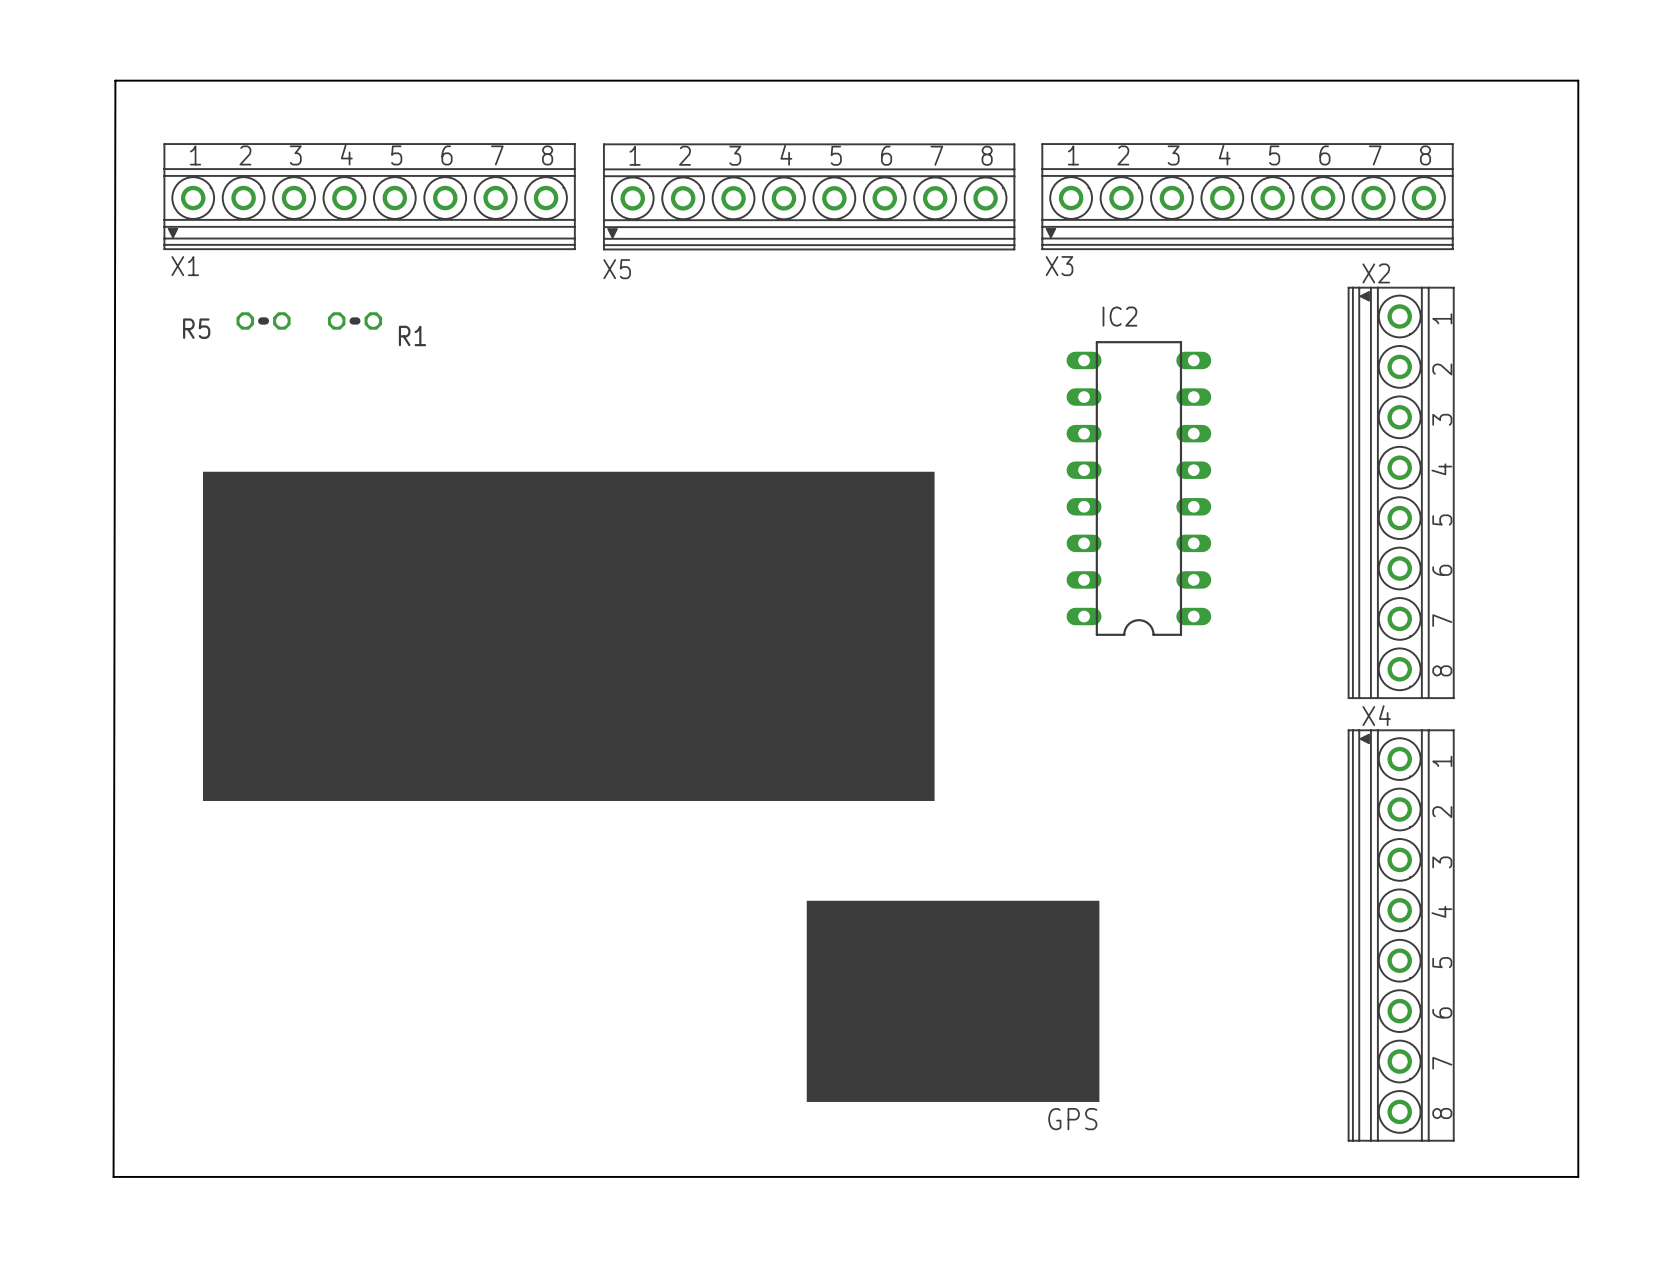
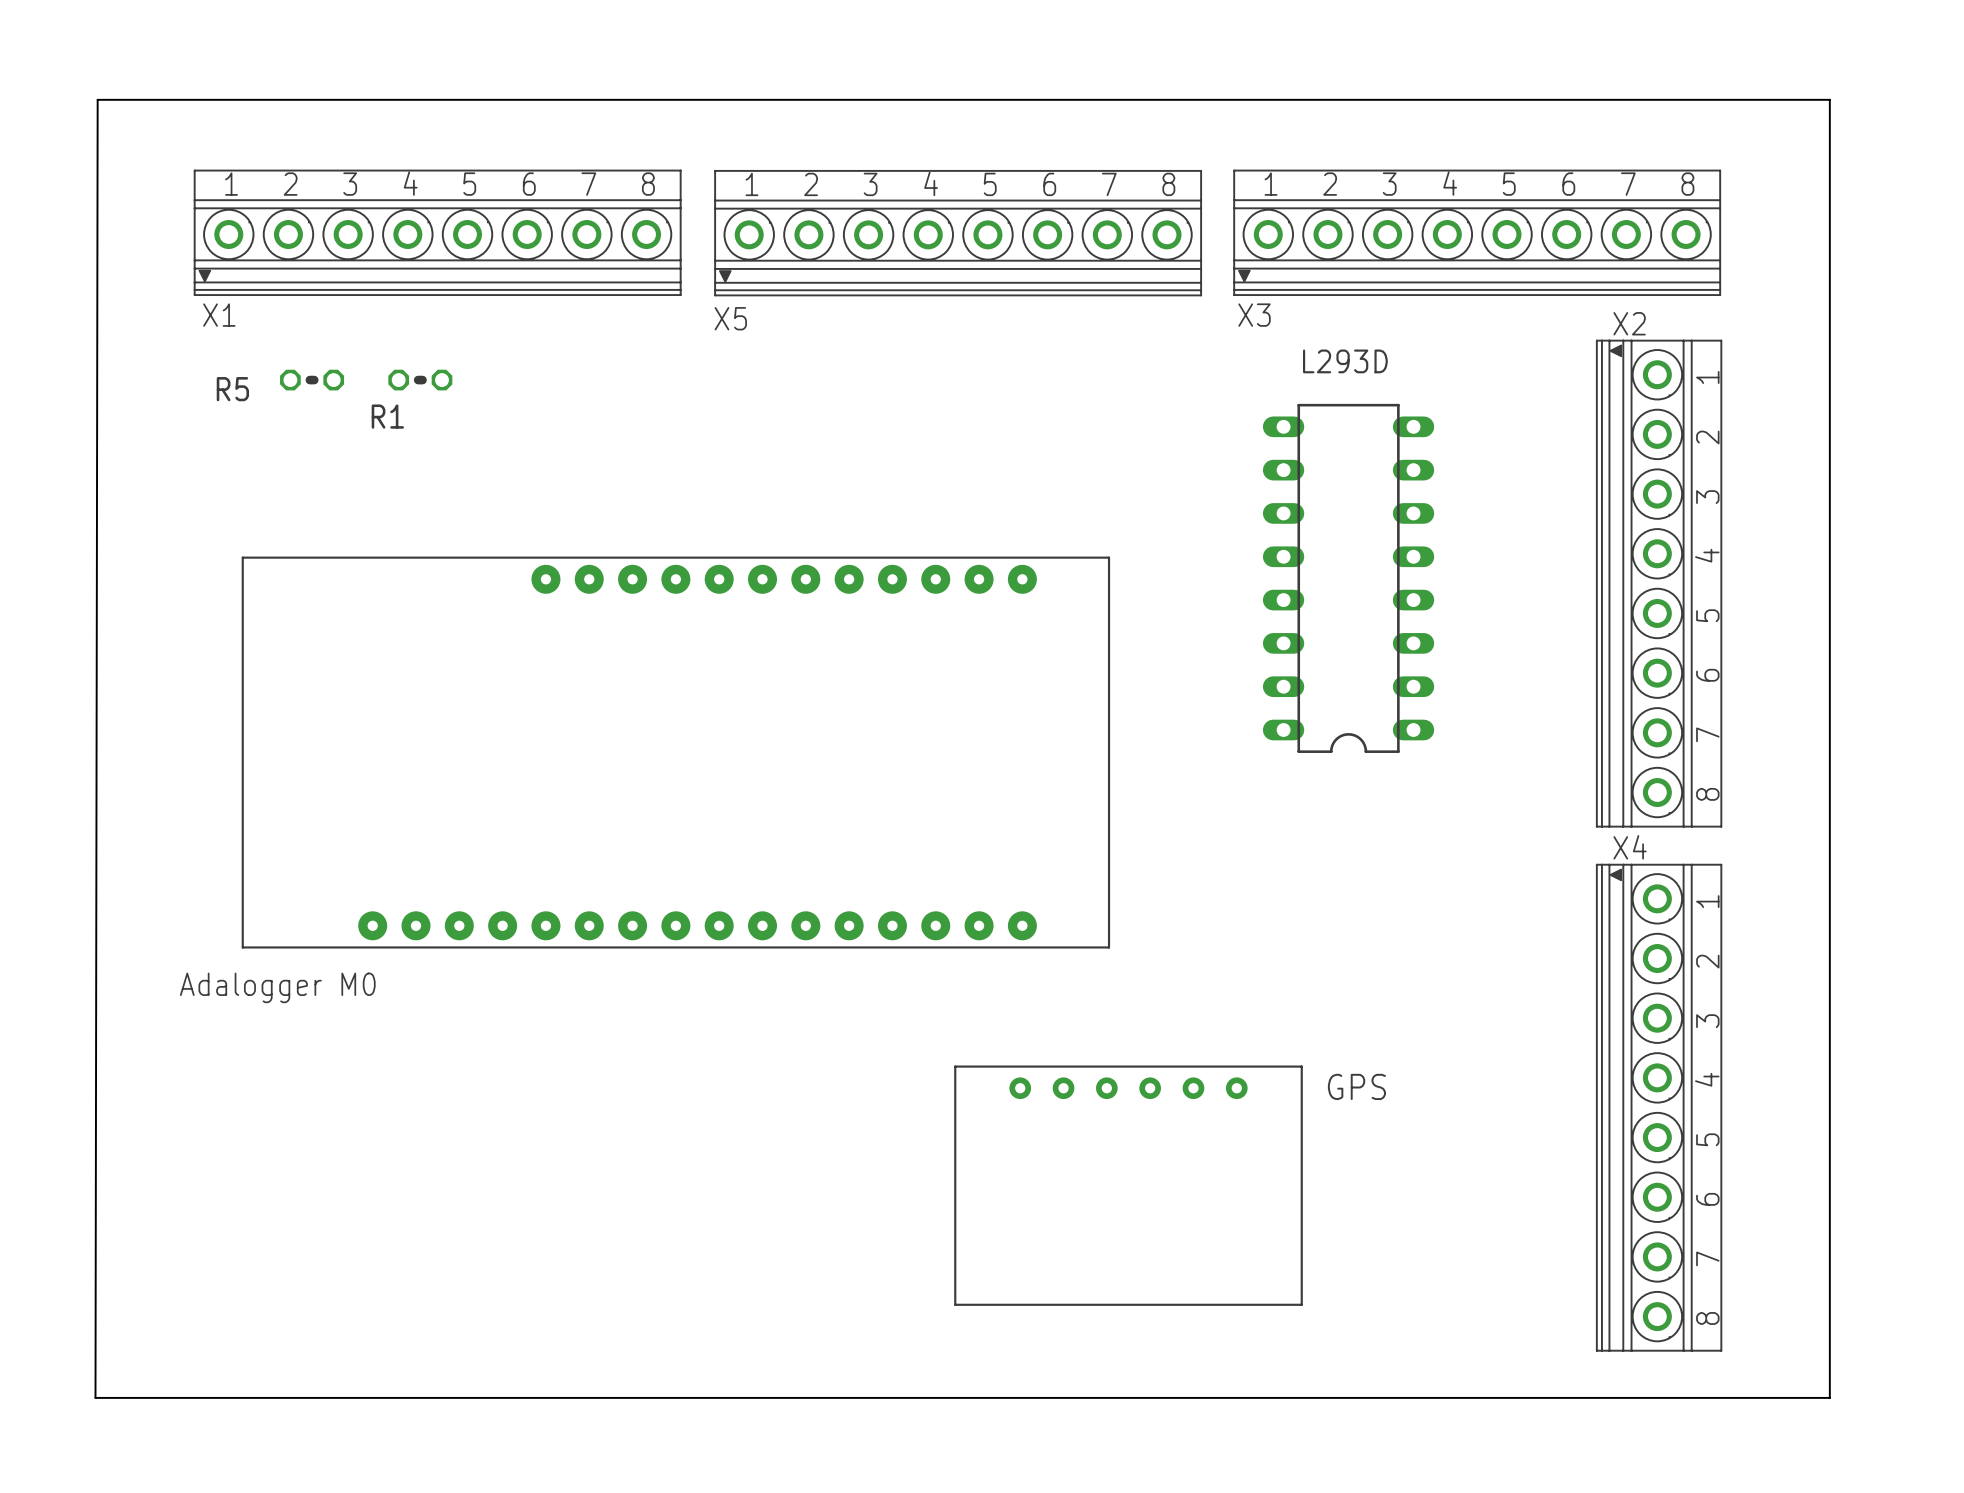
board edge: (115, 80) (1578, 80) (1578, 1176) (113, 1176) (115, 80) -> (97, 99) (95, 1397) (1829, 1397) (1829, 99) (97, 99)
IC2 value: none -> L293D (1345, 361)
IC2 name: IC2 (1119, 316) -> none
R1 name position: R1 (412, 335) -> R1 (387, 416)
part footprint: [202, 471, 935, 801] -> [241, 556, 1111, 949]
text: none -> Adalogger M0 (277, 987)
part footprint: [806, 900, 1100, 1102] -> [954, 1065, 1303, 1306]

